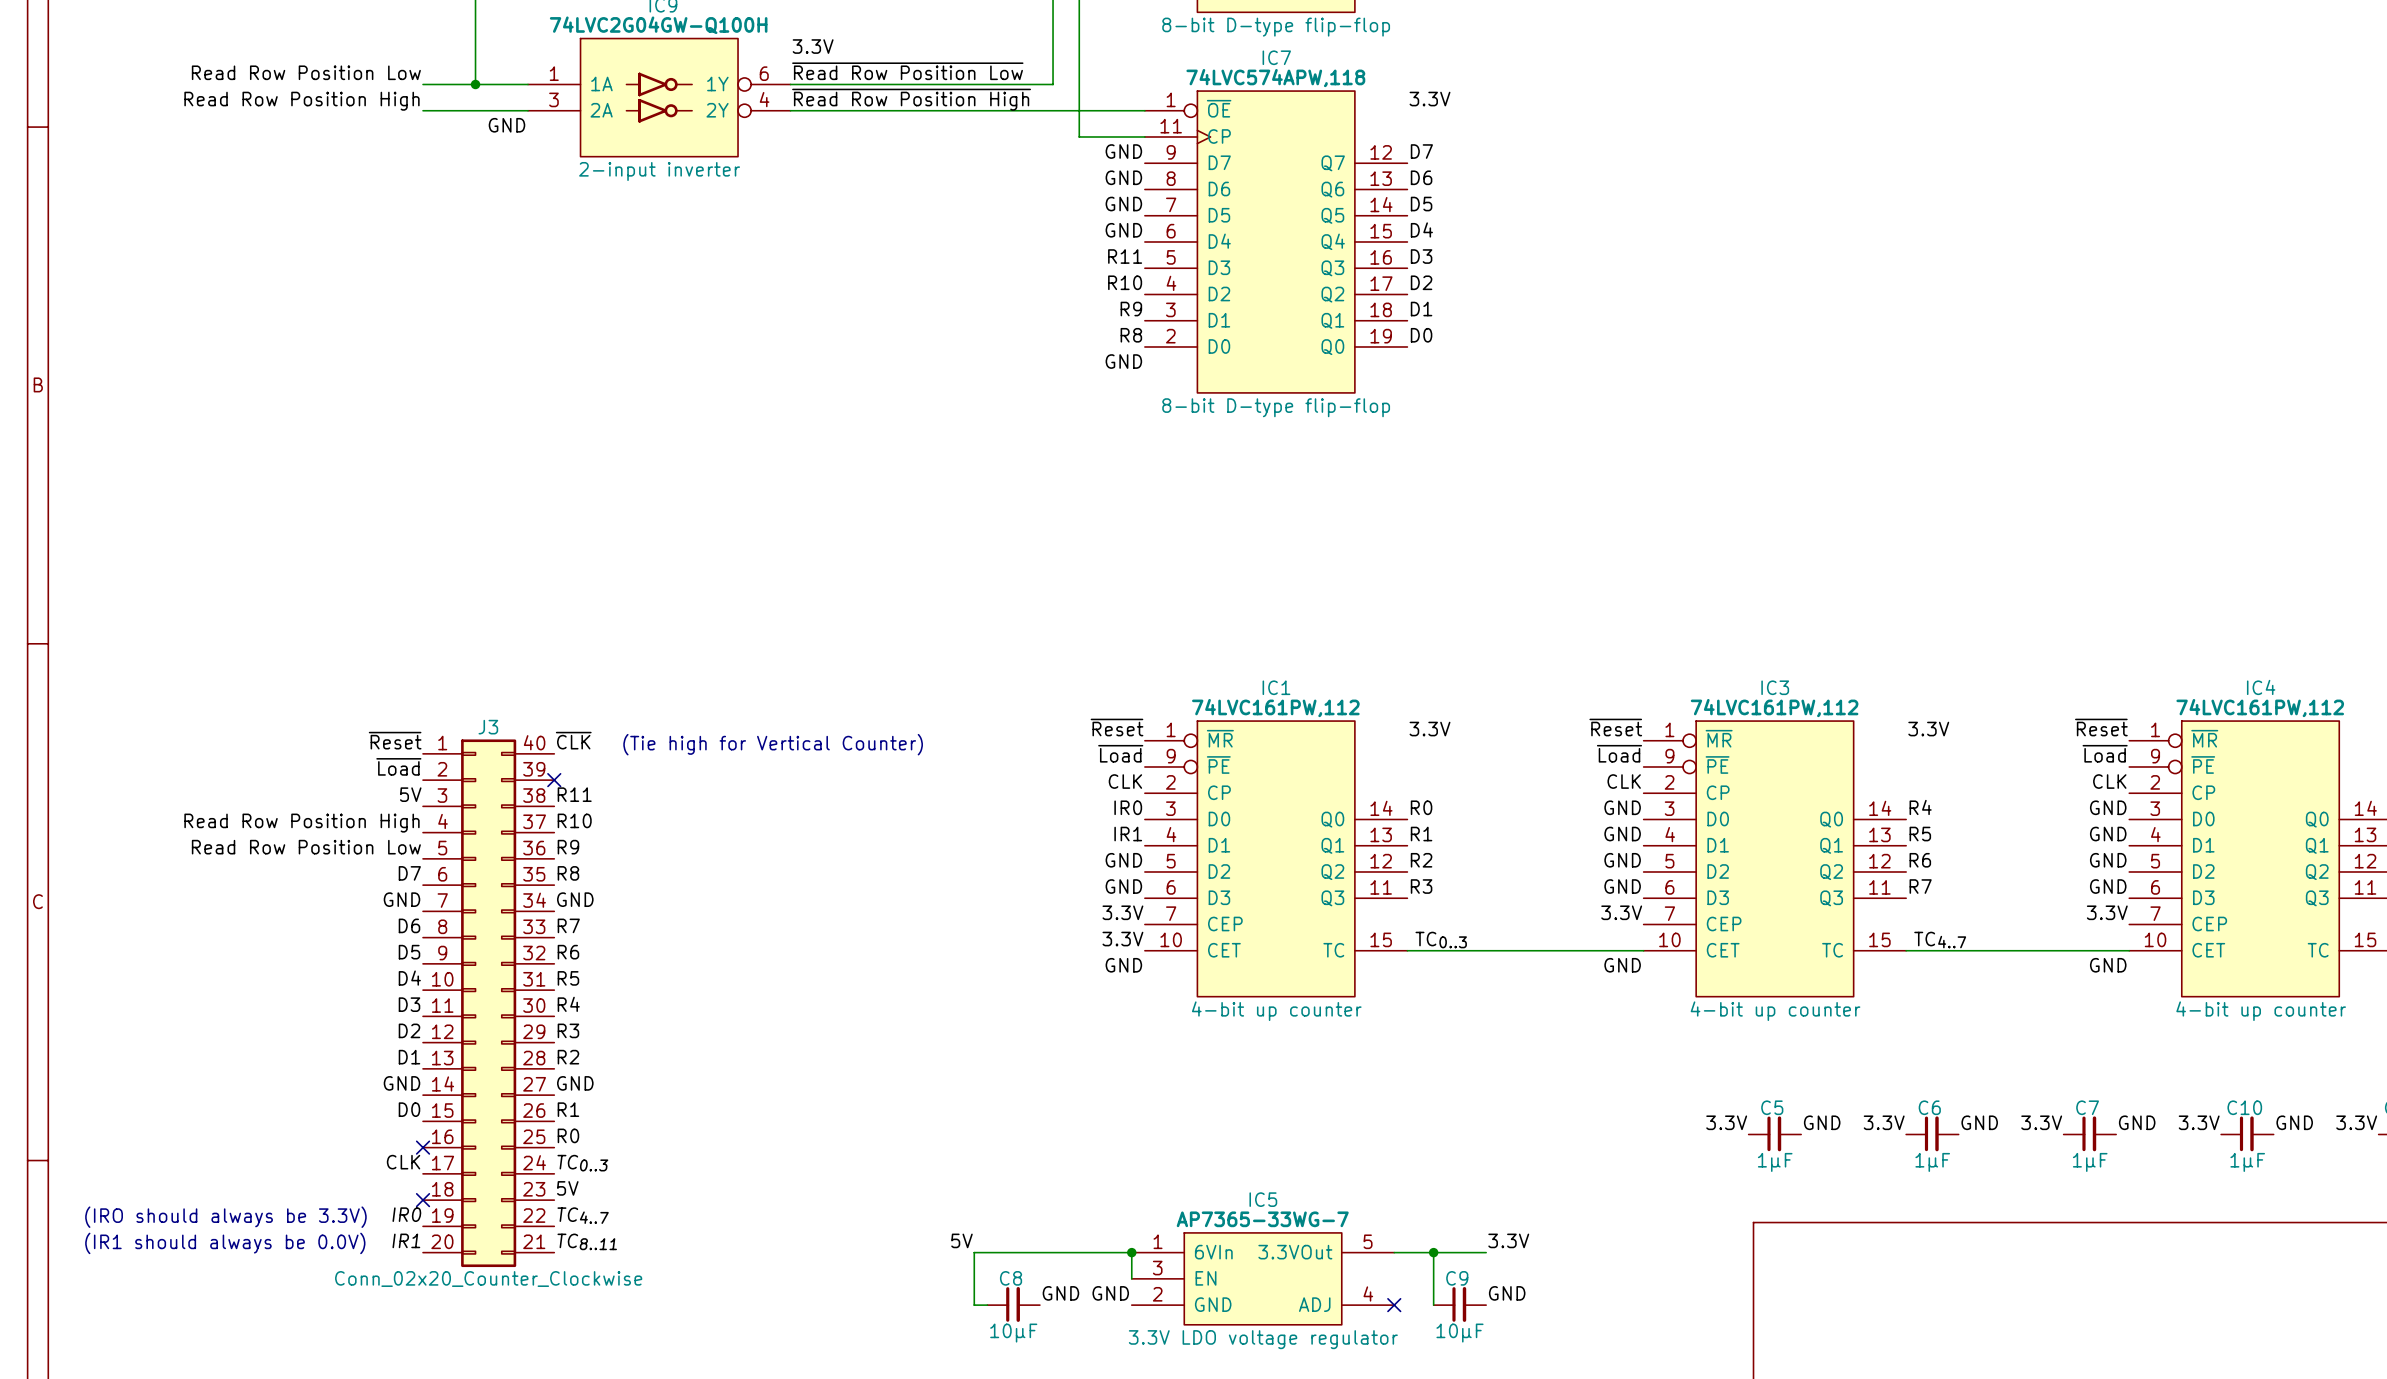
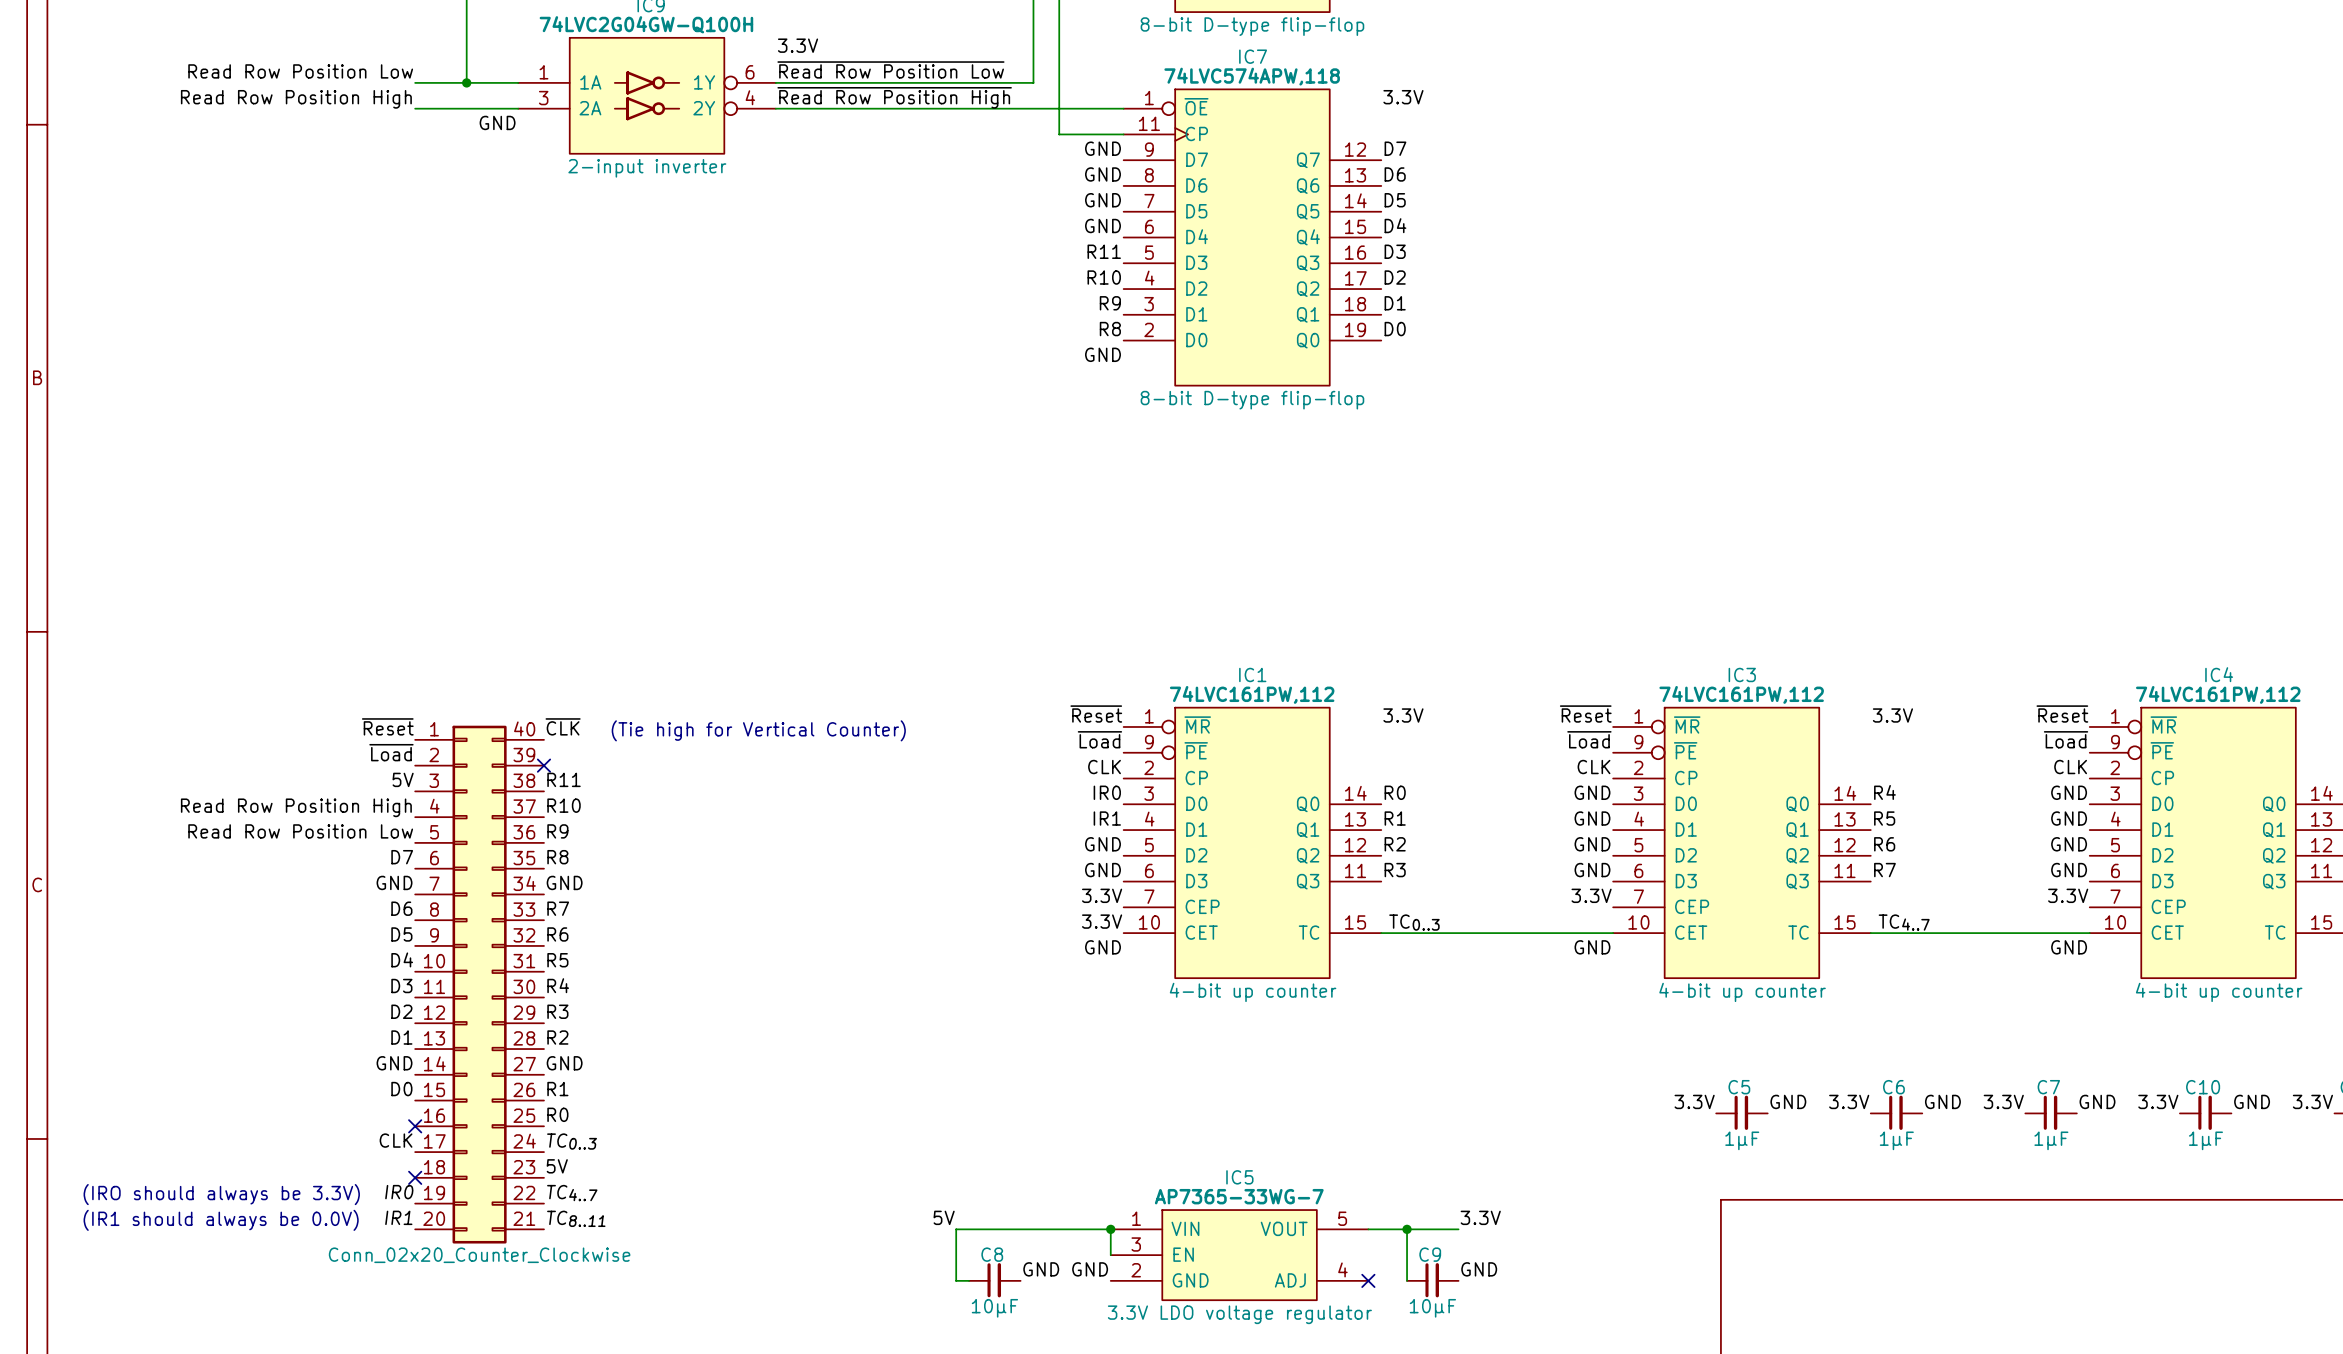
J3 name: J3 (488, 727) -> none
IC5 pin name: 6VIn (1213, 1252) -> VIN (1185, 1228)
IC5 pin name: 3.3VOut (1295, 1252) -> VOUT (1284, 1228)

